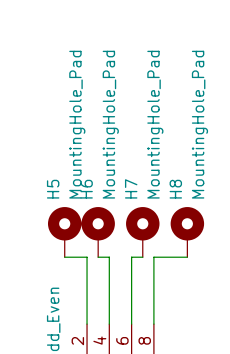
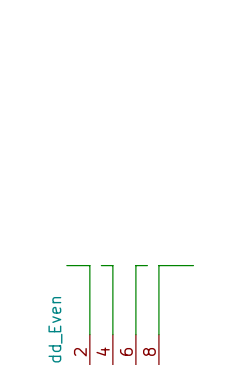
H5: MountingHole_Pad (64, 232) -> none
H6: MountingHole_Pad (98, 232) -> none
H7: MountingHole_Pad (142, 232) -> none
H8: MountingHole_Pad (187, 232) -> none

